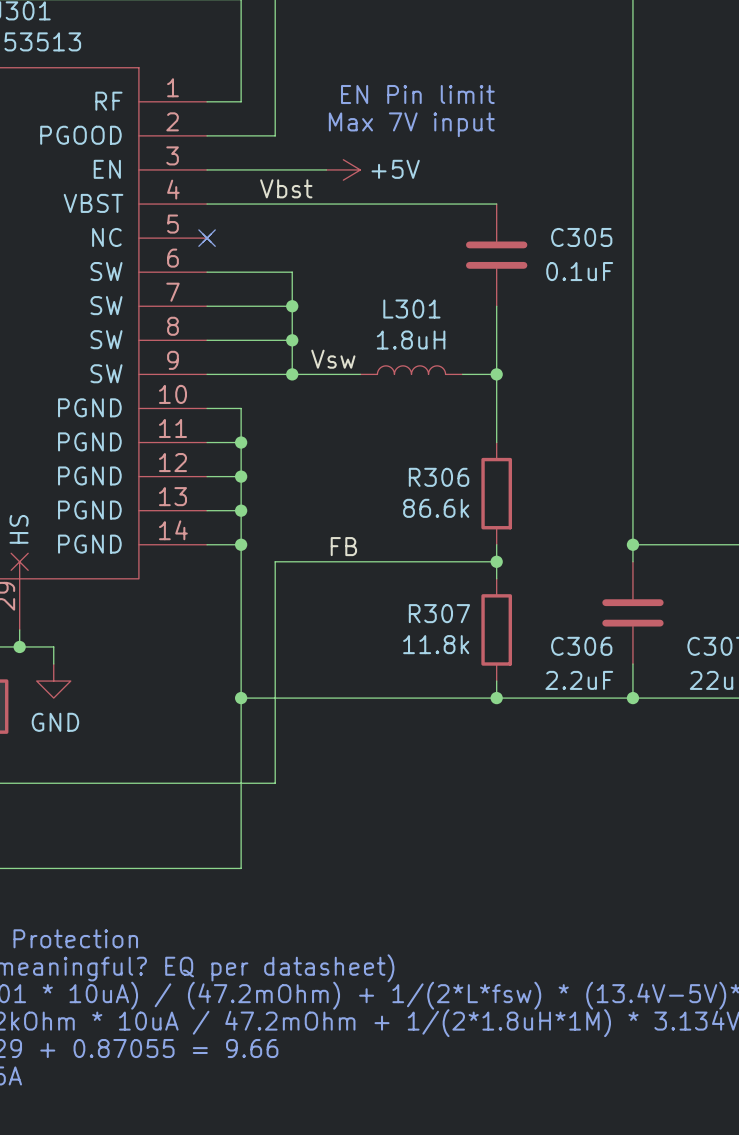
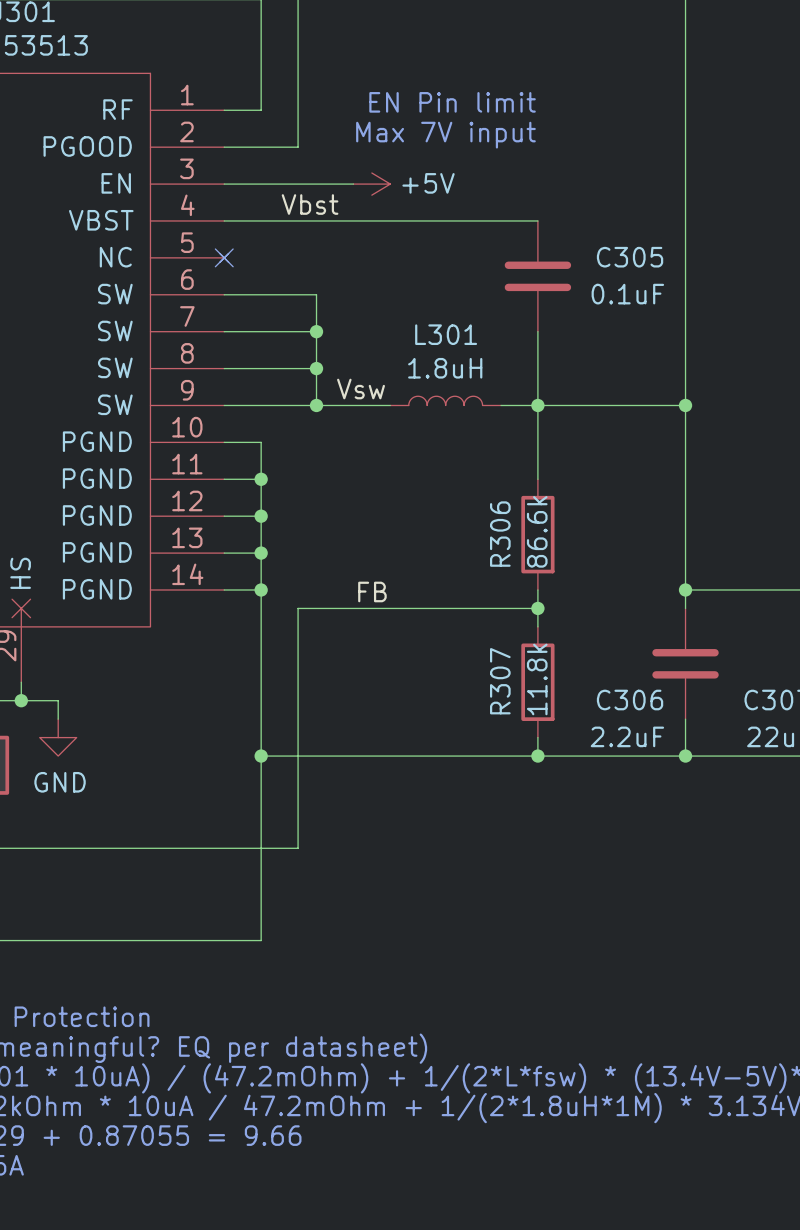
wire: none -> (537, 405) (685, 405)
junction: none -> (685, 405)
R306 name rotation: 0° (439, 477) -> 90° counterclockwise (500, 534)
R306 value rotation: 0° (436, 508) -> 90° counterclockwise (537, 531)
R307 name rotation: 0° (439, 613) -> 90° counterclockwise (500, 681)
R307 value rotation: 0° (436, 644) -> 90° counterclockwise (537, 679)

